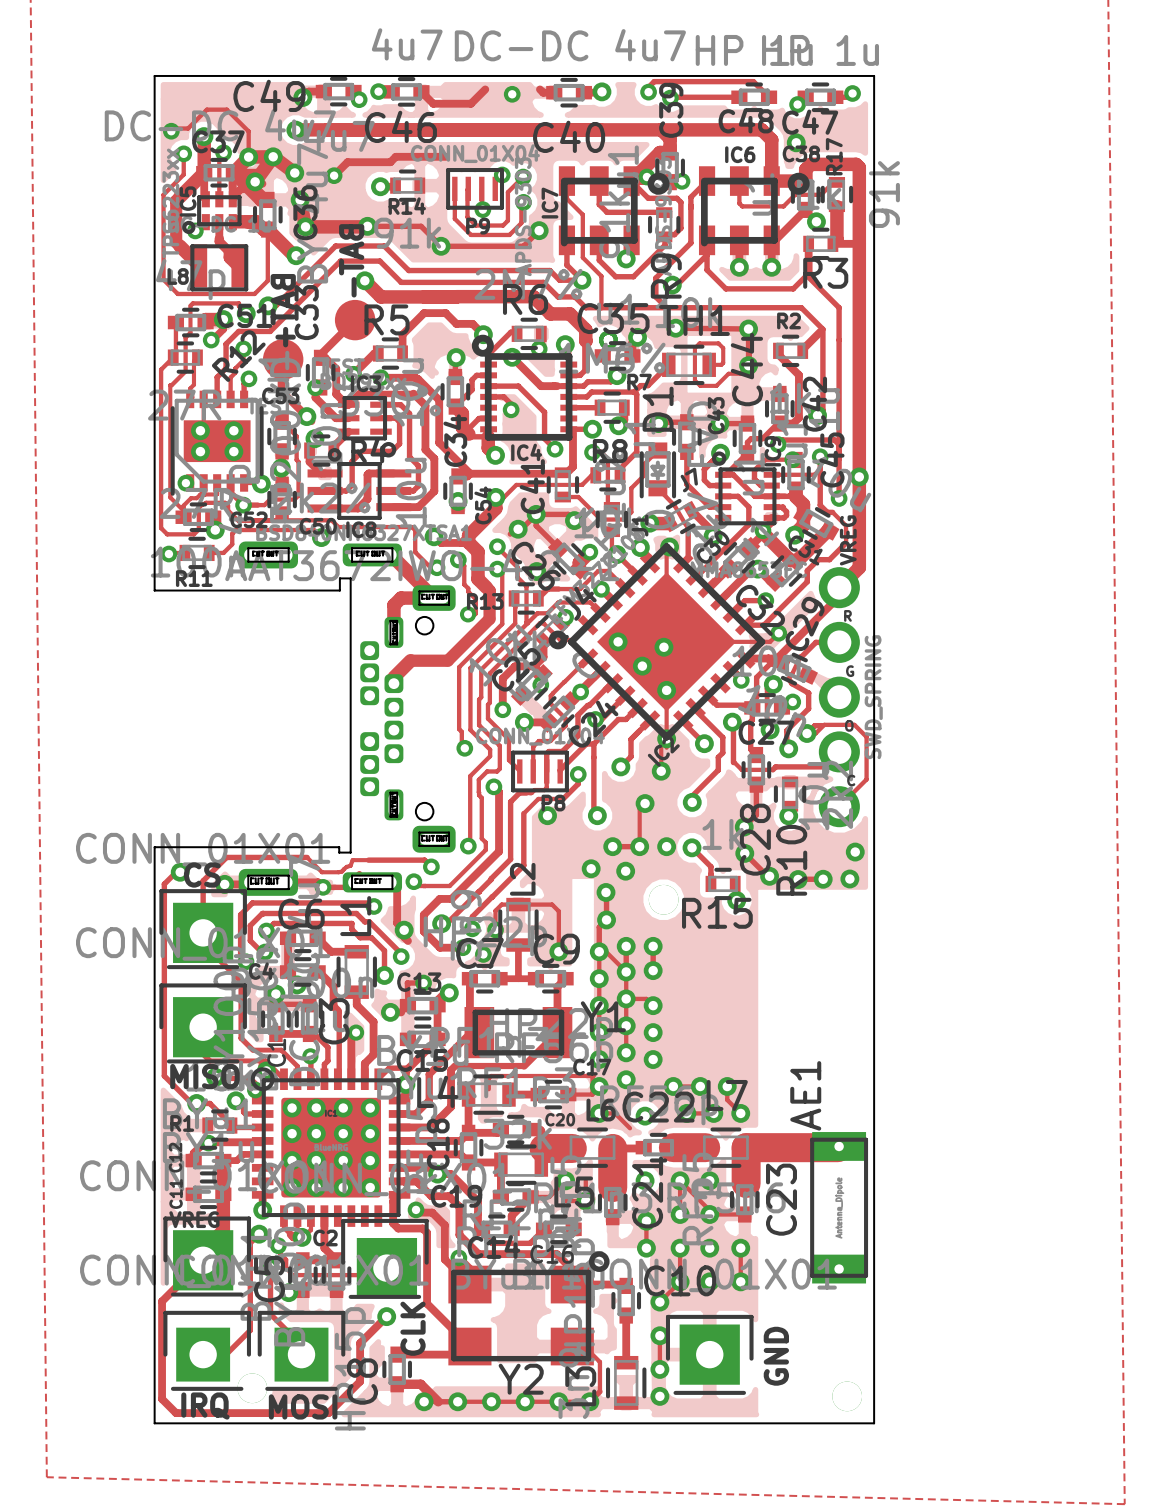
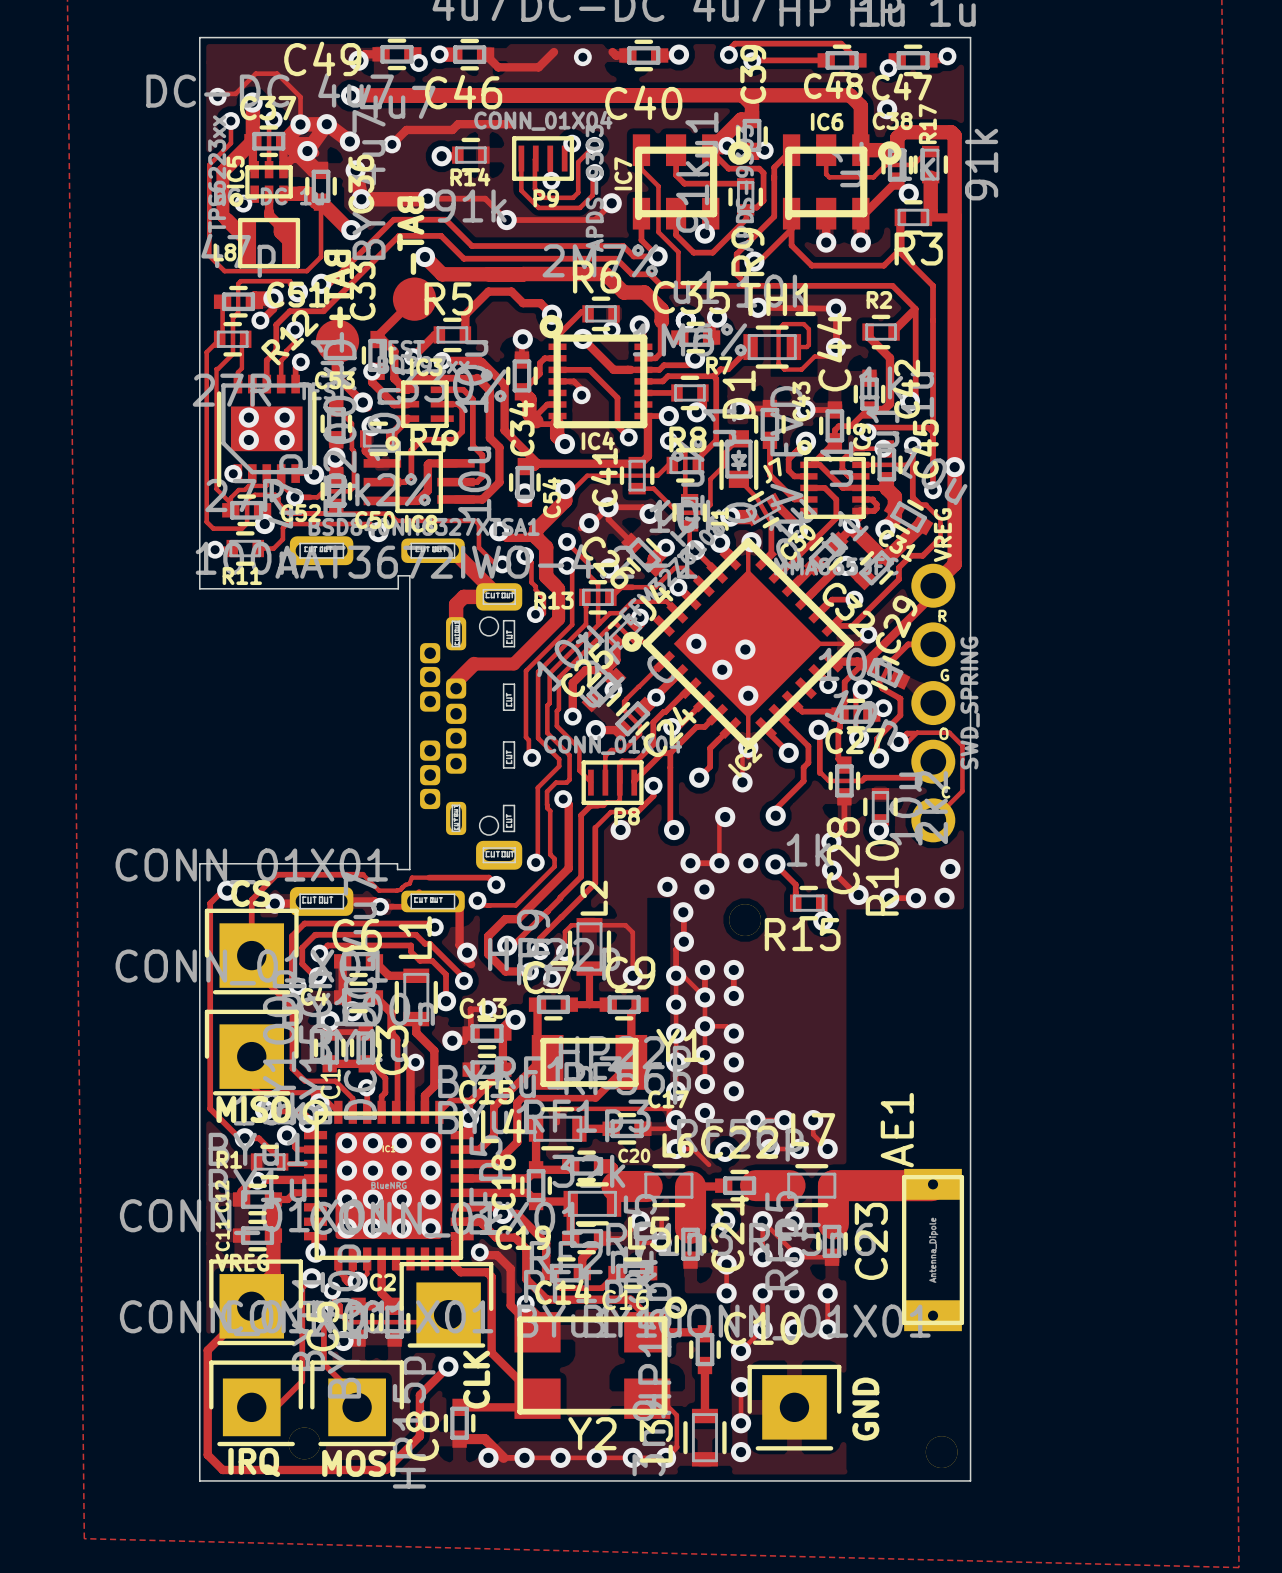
part footprint: [238, 541, 456, 896] -> [289, 536, 523, 916]
board edge: none -> (503, 620) (503, 646) (514, 646) (514, 620) (503, 620)
board edge: none -> (506, 630) (506, 633)
board edge: none -> (506, 632) (511, 632)
board edge: none -> (506, 635) (511, 635) (511, 638)
board edge: none -> (506, 638) (511, 638)
board edge: none -> (506, 640) (506, 642)
board edge: none -> (511, 640) (511, 643) (506, 643)
board edge: none -> (503, 684) (503, 710) (514, 710) (514, 684) (503, 684)
board edge: none -> (506, 693) (506, 696)
board edge: none -> (506, 694) (510, 694)
board edge: none -> (506, 698) (511, 698) (511, 700)
board edge: none -> (506, 700) (511, 700)
board edge: none -> (506, 703) (506, 705)
board edge: none -> (511, 703) (511, 705) (506, 705)
board edge: none -> (503, 741) (503, 767) (514, 767) (514, 741) (503, 741)
board edge: none -> (506, 750) (506, 753)
board edge: none -> (506, 752) (510, 752)
board edge: none -> (506, 755) (511, 755) (511, 758)
board edge: none -> (506, 758) (511, 758)
board edge: none -> (506, 760) (506, 763)
board edge: none -> (511, 760) (511, 763) (506, 763)
board edge: none -> (503, 805) (503, 831) (514, 831) (514, 805) (503, 805)
board edge: none -> (506, 814) (506, 817)
board edge: none -> (506, 816) (510, 816)
board edge: none -> (506, 819) (511, 819) (511, 821)
board edge: none -> (506, 822) (511, 822)
board edge: none -> (506, 824) (506, 826)
board edge: none -> (511, 824) (511, 827) (506, 827)

